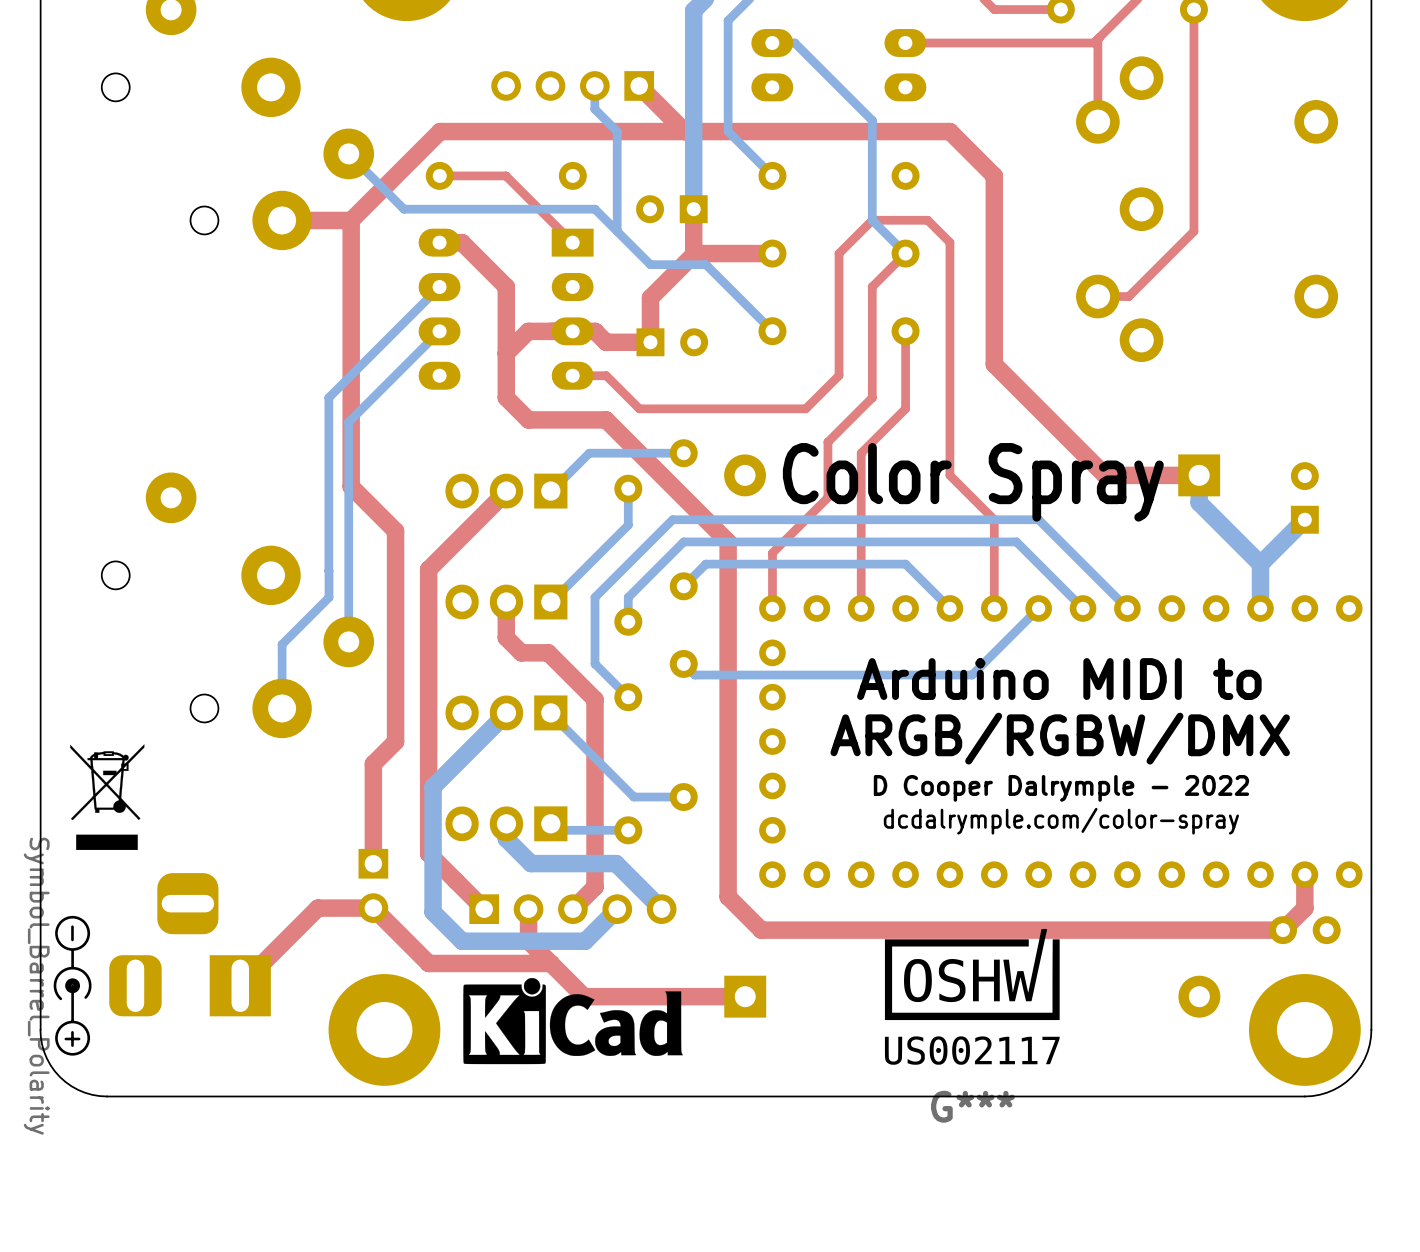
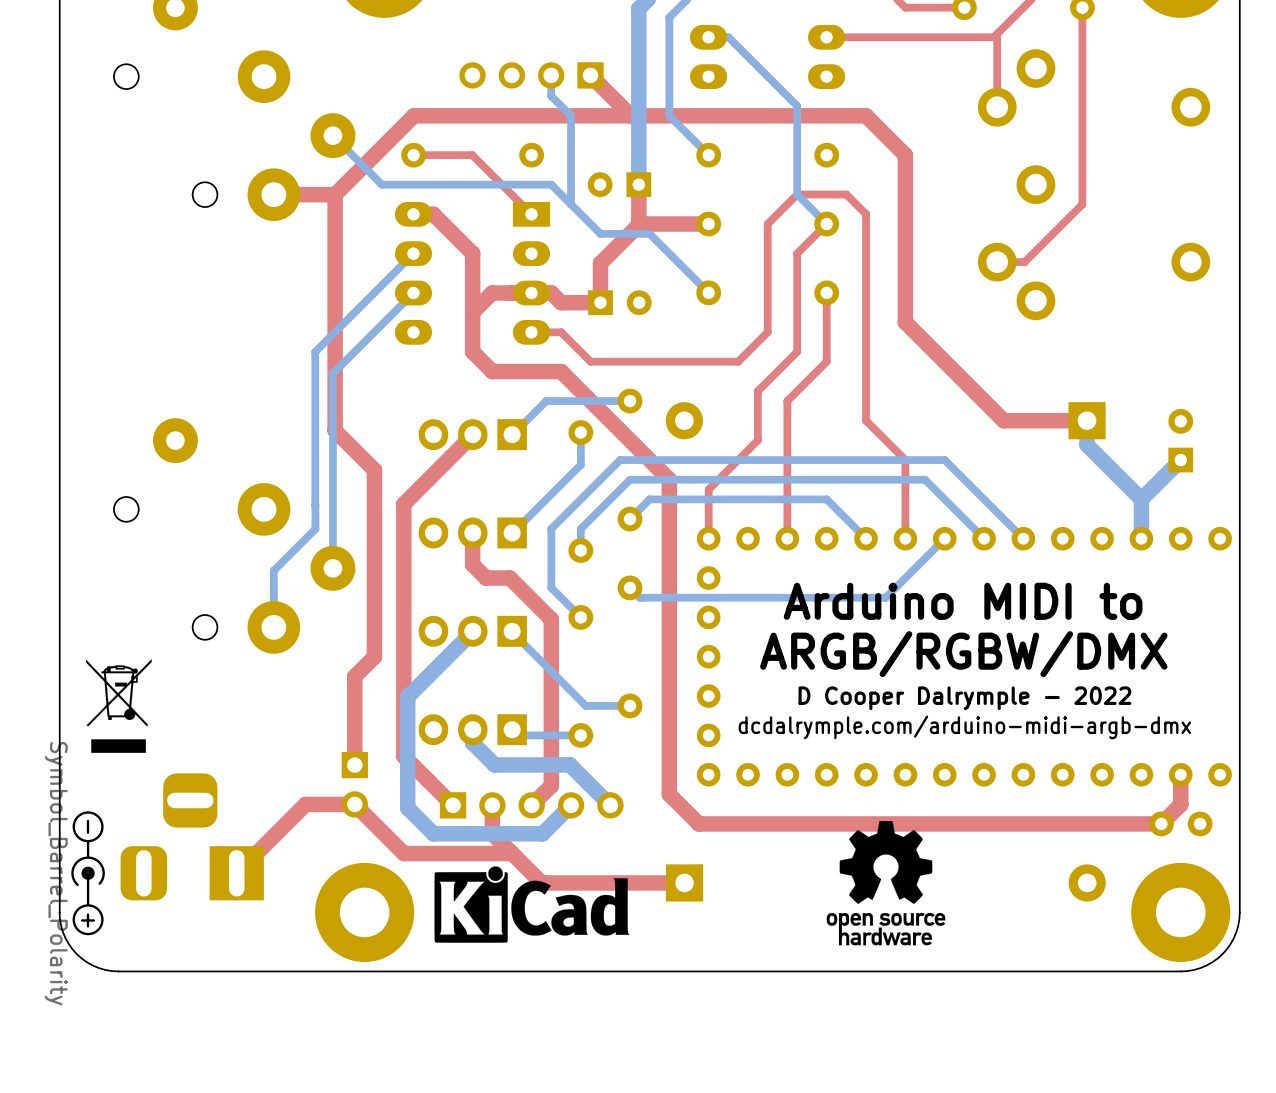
text: Color Spray (973, 482) -> none
text: dcdalrymple.com/color-spray (1061, 821) -> dcdalrymple.com/arduino-midi-argb-dmx (964, 727)
drawing: none -> [826, 821, 946, 946]
G***: (972, 996) -> none

